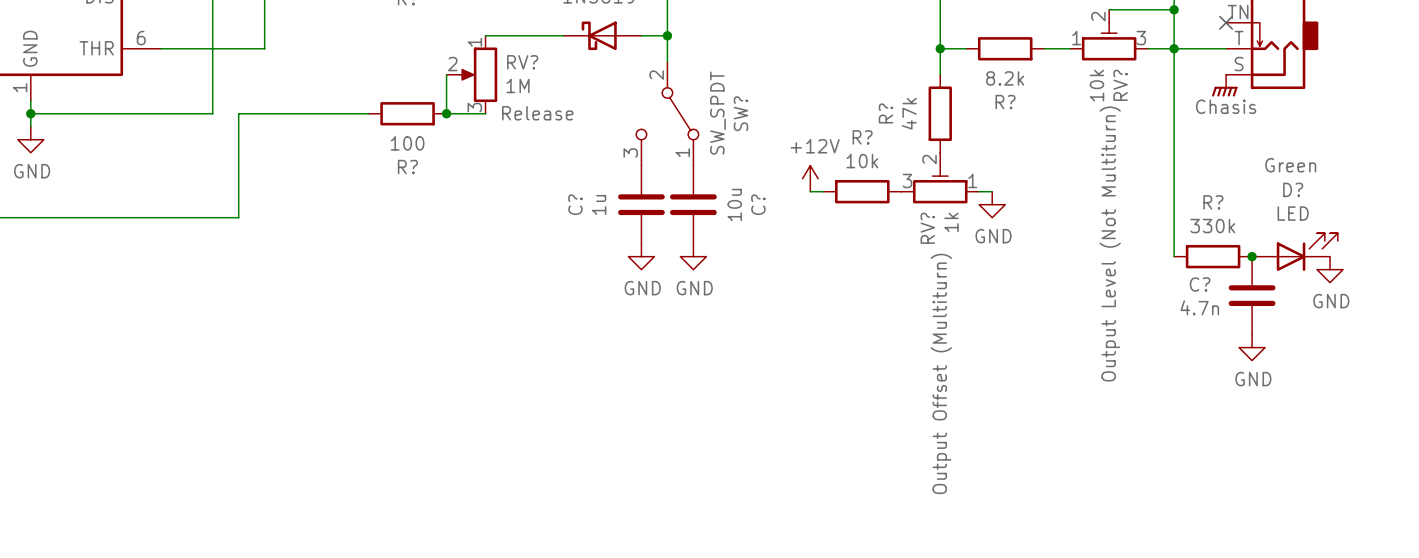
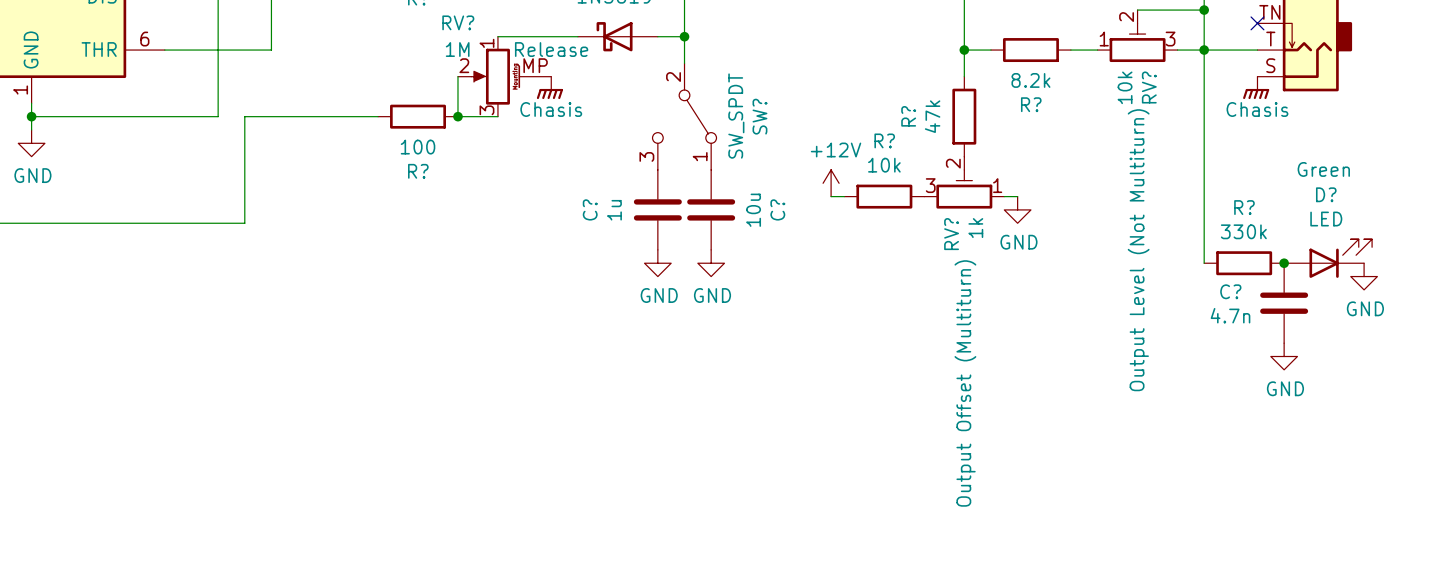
RV?: 1M (471, 74) -> none
RV?: none -> 1M (504, 76)
power symbol: none -> Chasis (549, 87)

